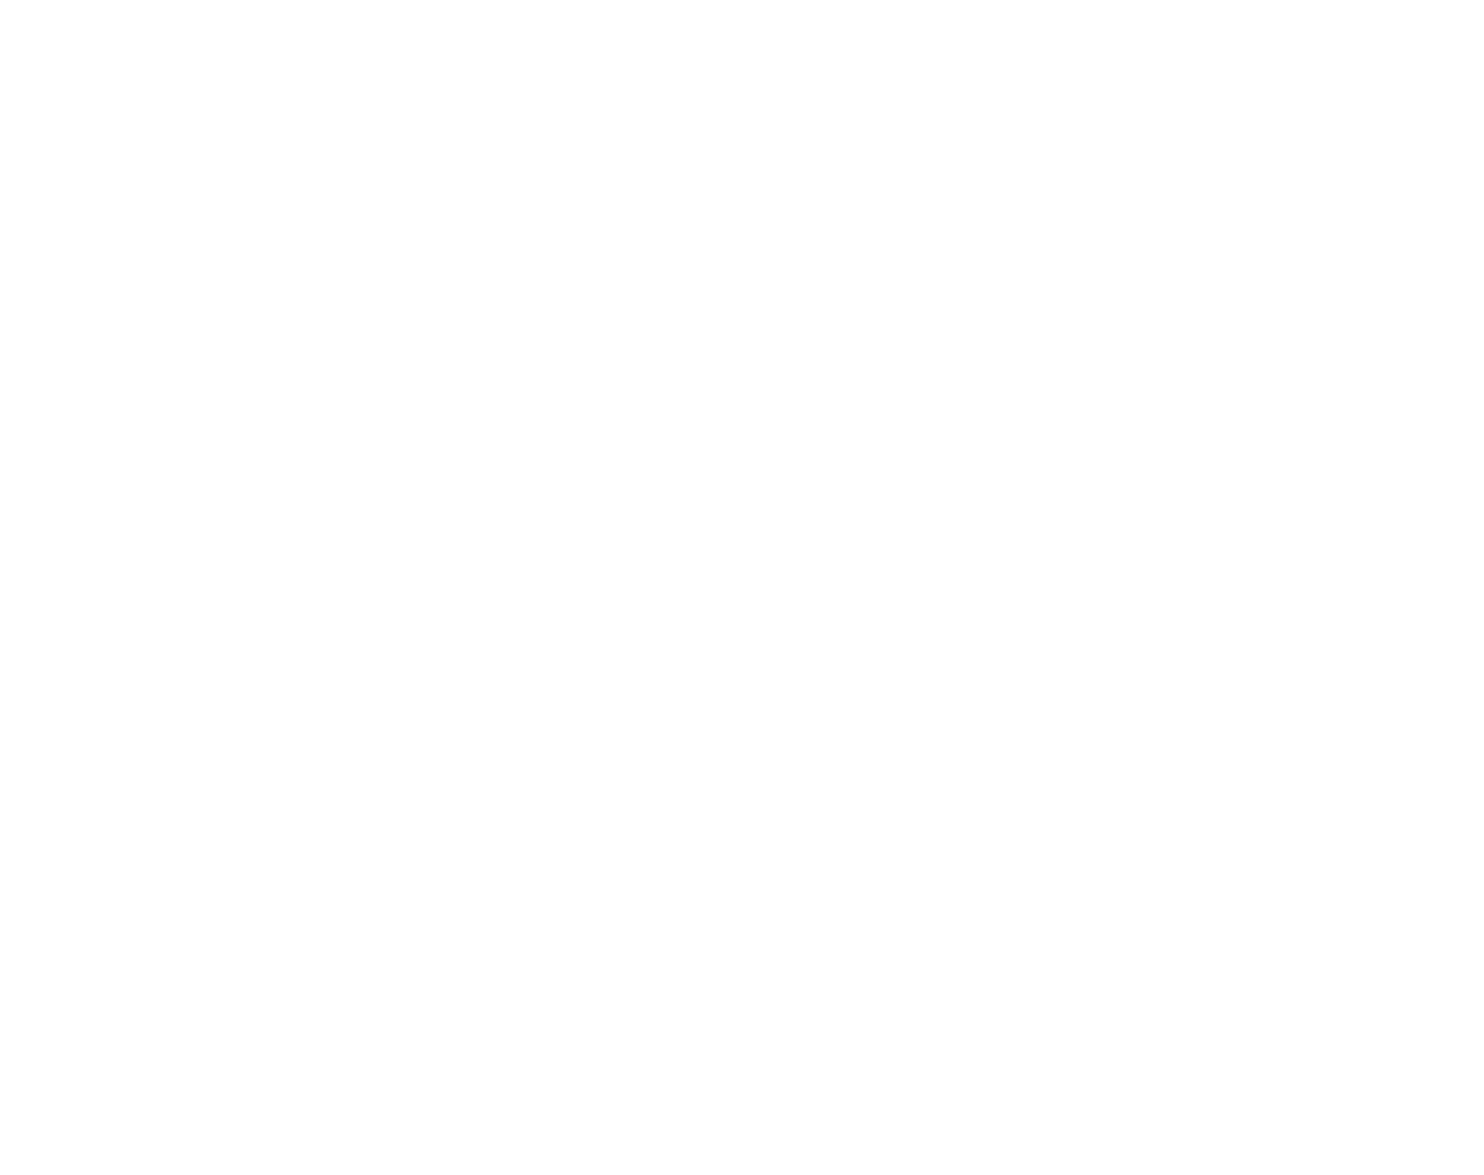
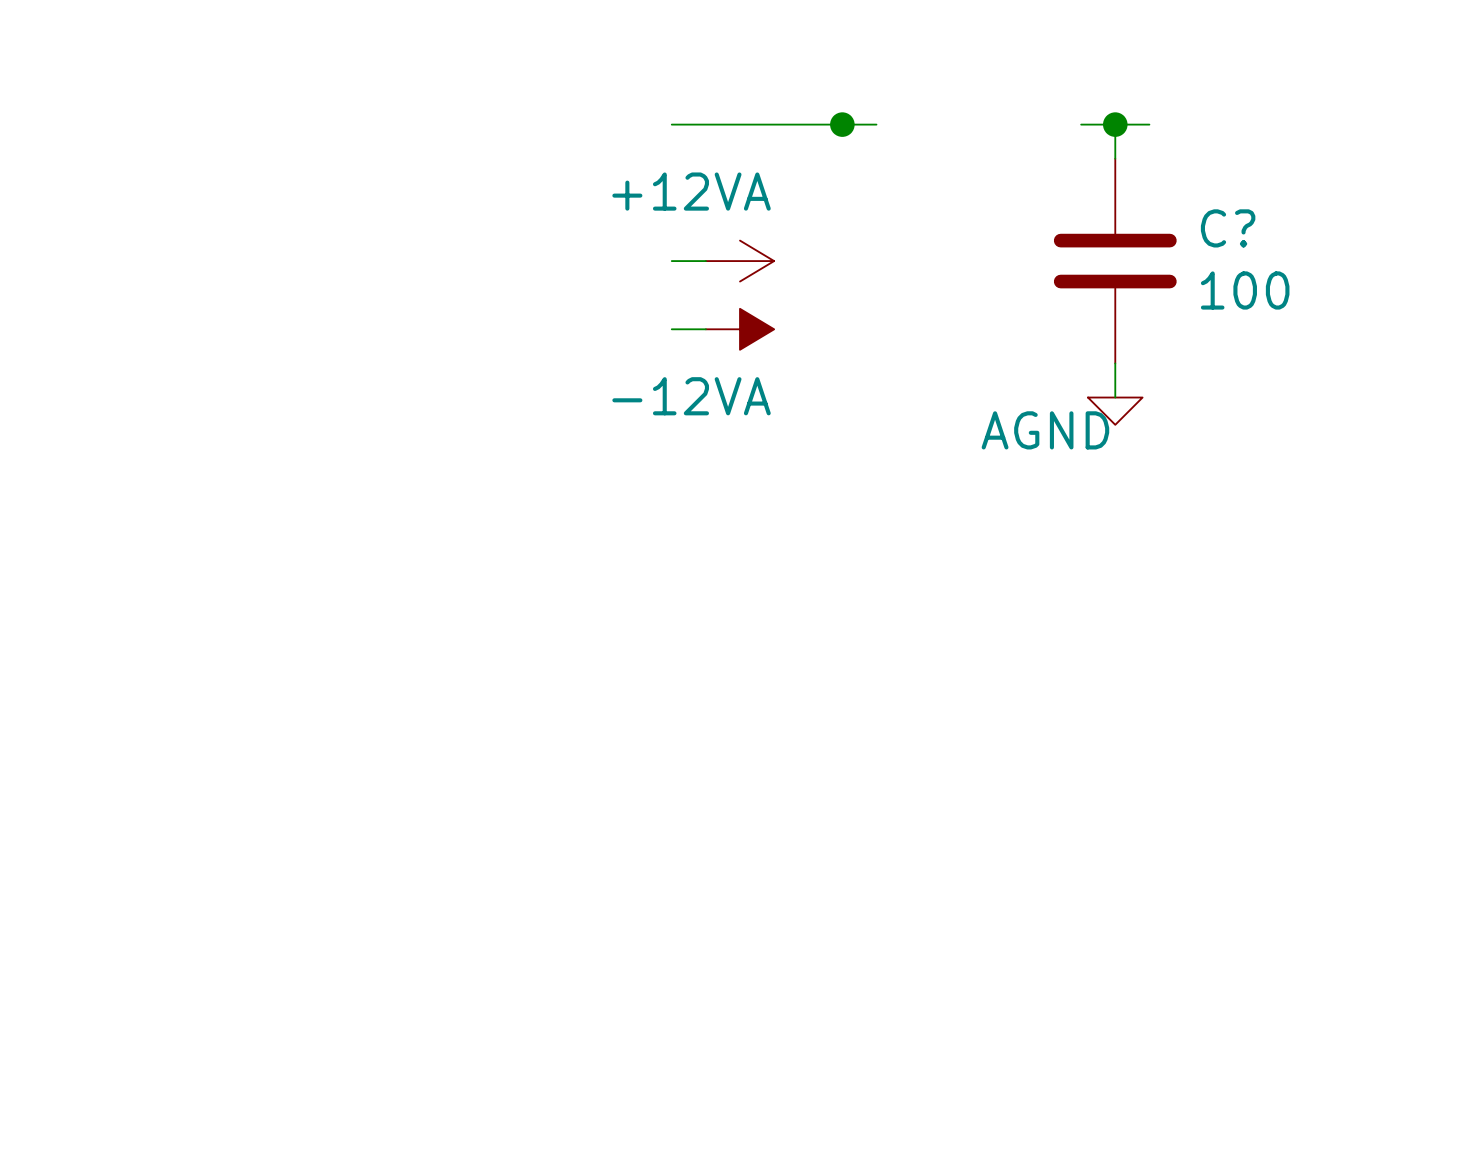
wire: none -> (671, 124) (876, 124)
junction: none -> (842, 124)
wire: none -> (1081, 124) (1149, 124)
wire: none -> (1115, 124) (1115, 158)
junction: none -> (1115, 124)
wire: none -> (671, 261) (705, 261)
power symbol: none -> +12VA (740, 261)
C?: none -> 100 (1115, 261)
wire: none -> (671, 329) (705, 329)
power symbol: none -> -12VA (740, 329)
wire: none -> (1115, 363) (1115, 397)
power symbol: none -> AGND (1115, 411)

